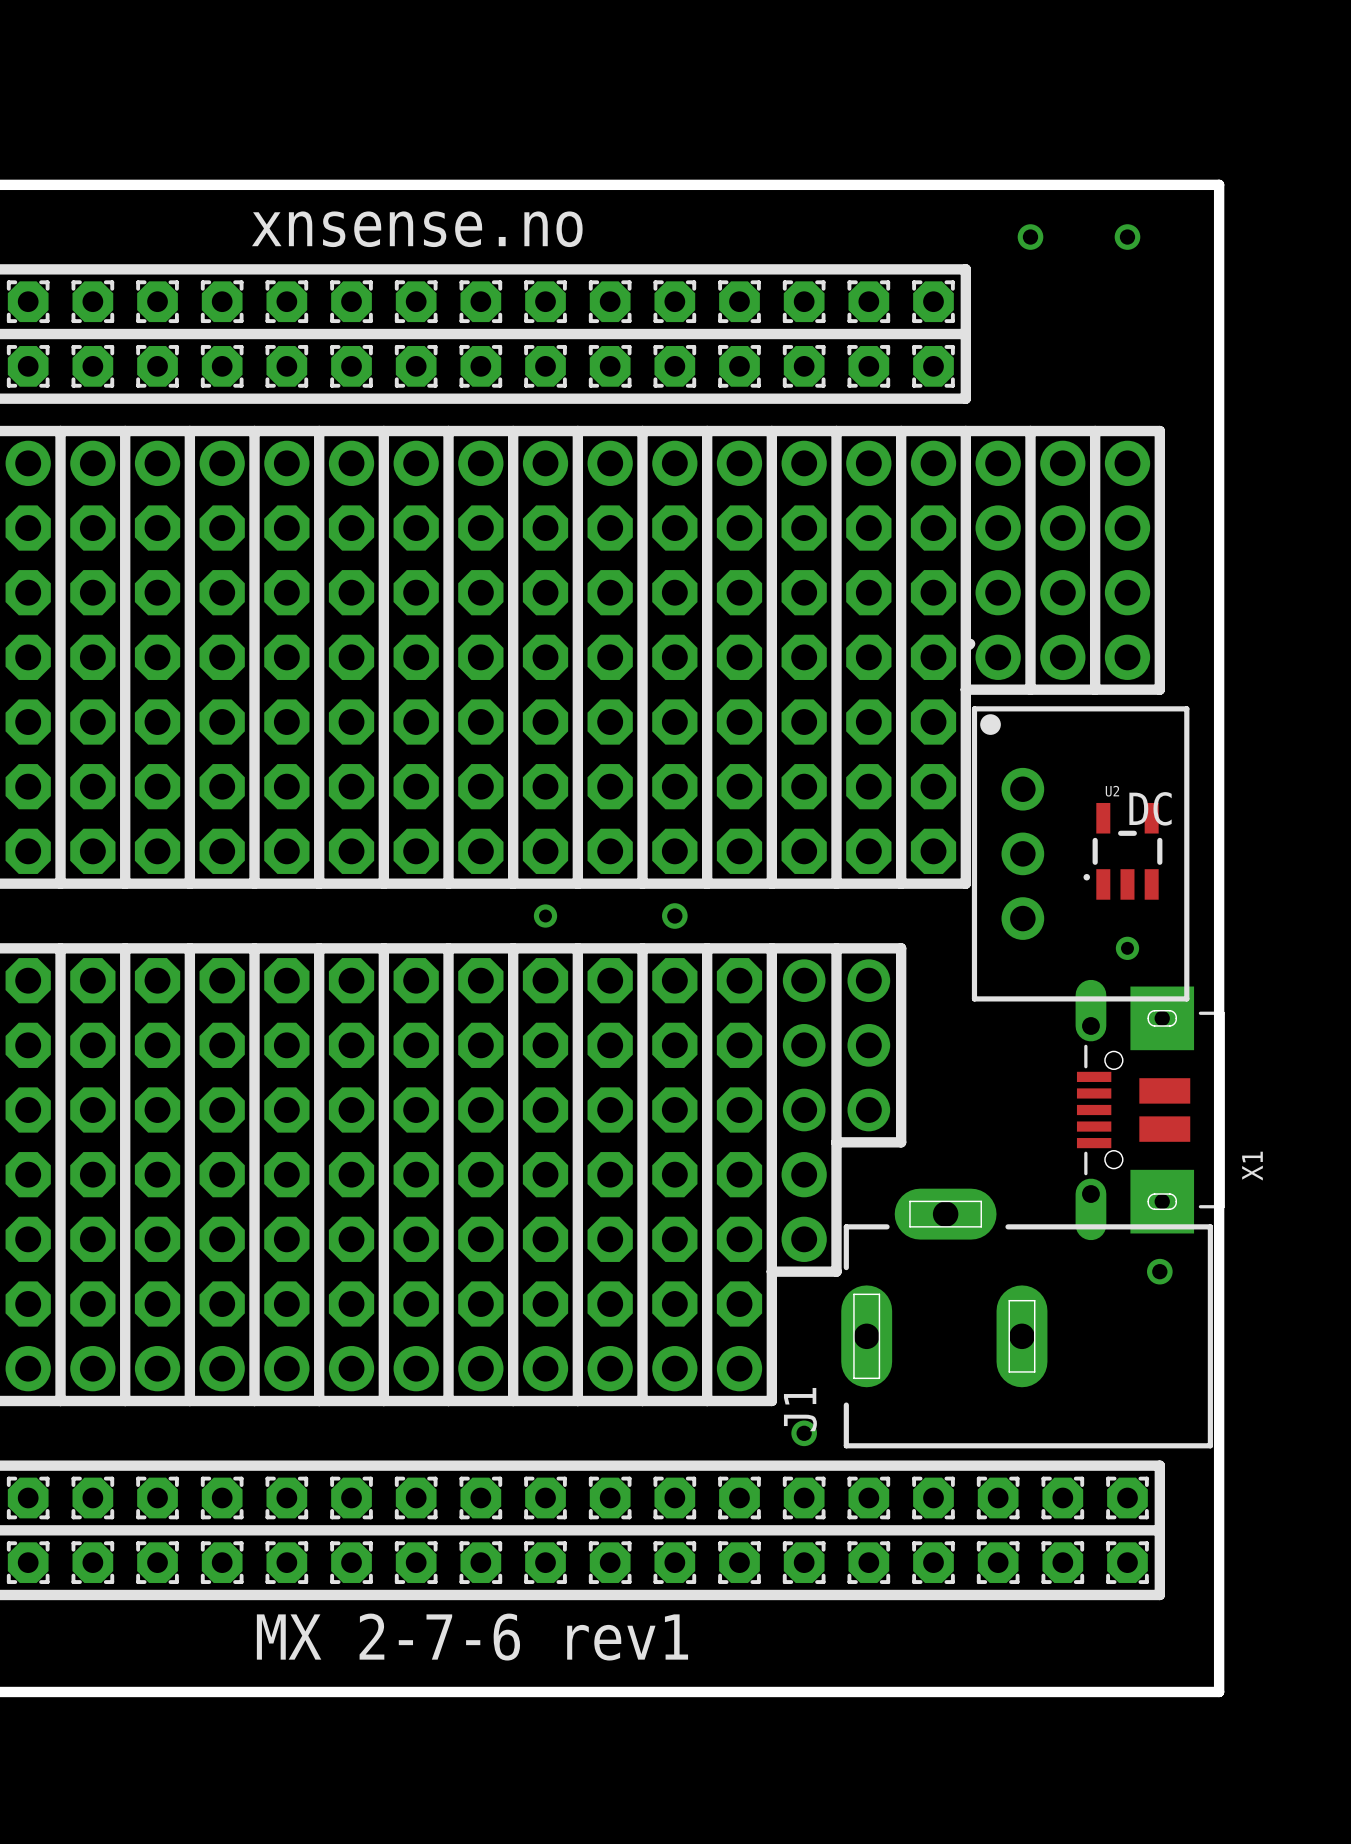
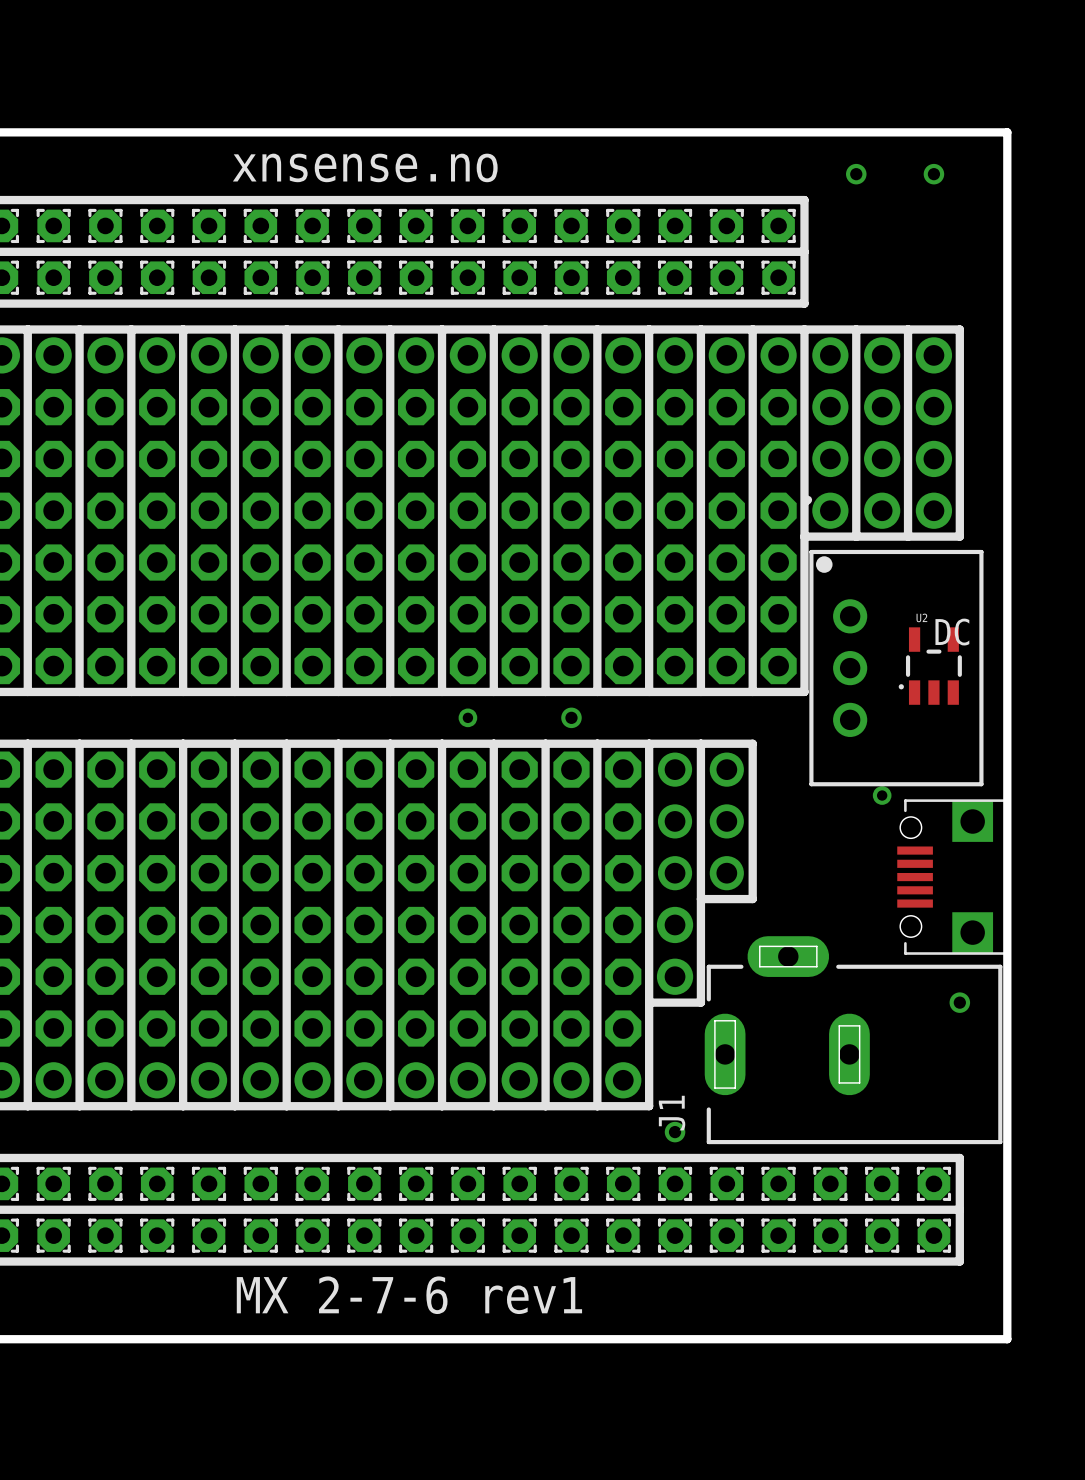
via position: (1127, 948) -> (882, 795)
X1: (1150, 1110) -> none
part: none -> (952, 877)

